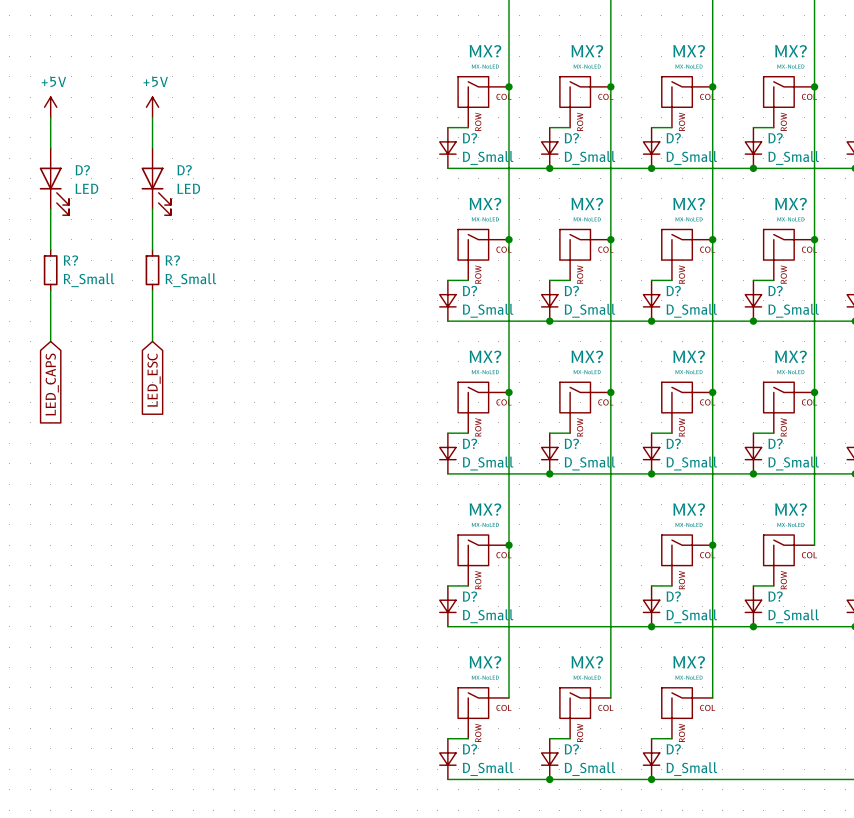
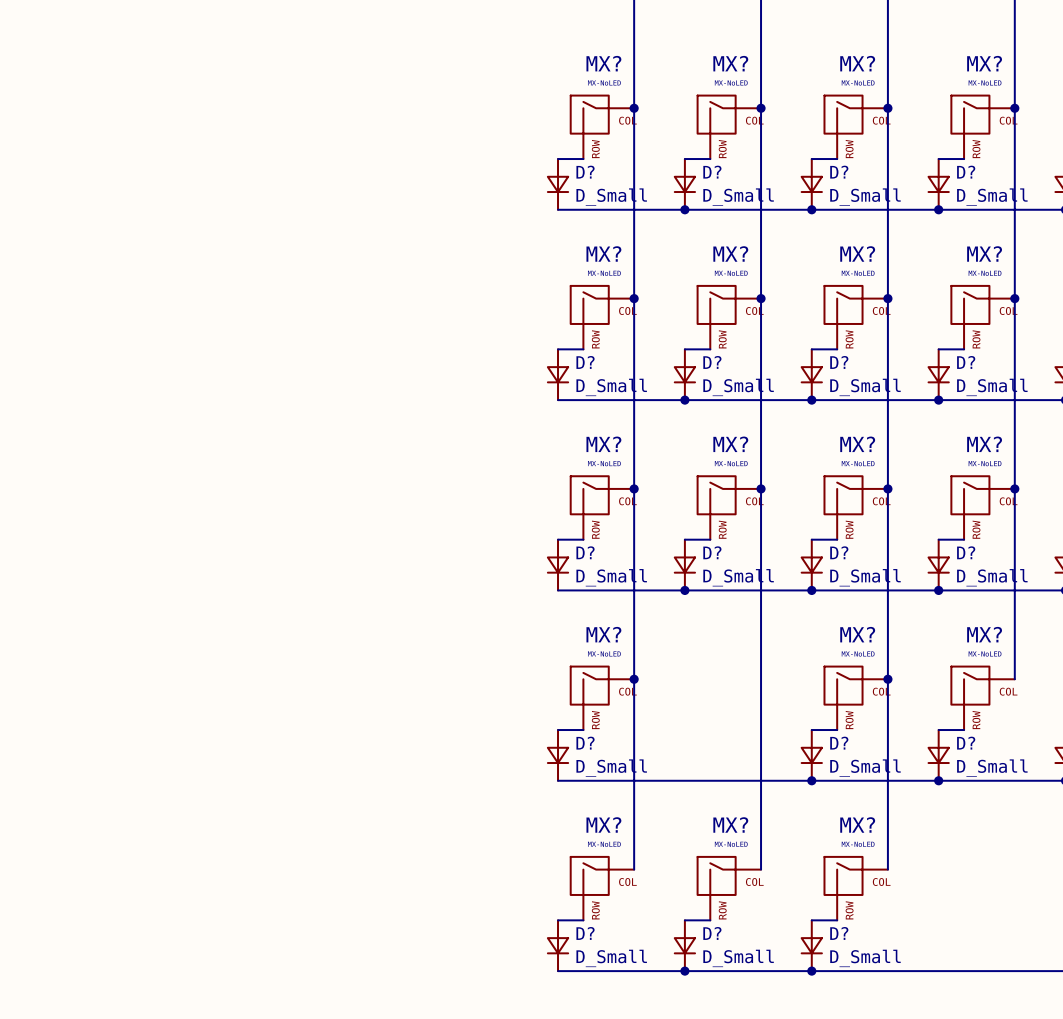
power symbol: +5V (50, 107) -> none
power symbol: +5V (152, 107) -> none
wire: (50, 117) (50, 148) -> none
wire: (152, 117) (152, 148) -> none
D?: LED (54, 181) -> none
D?: LED (156, 181) -> none
wire: (50, 209) (50, 249) -> none
wire: (152, 209) (152, 249) -> none
R?: R_Small (50, 270) -> none
R?: R_Small (152, 270) -> none
wire: (50, 290) (50, 341) -> none
wire: (152, 290) (152, 341) -> none
global label: LED_ESC (154, 380) -> none
global label: LED_CAPS (52, 384) -> none

